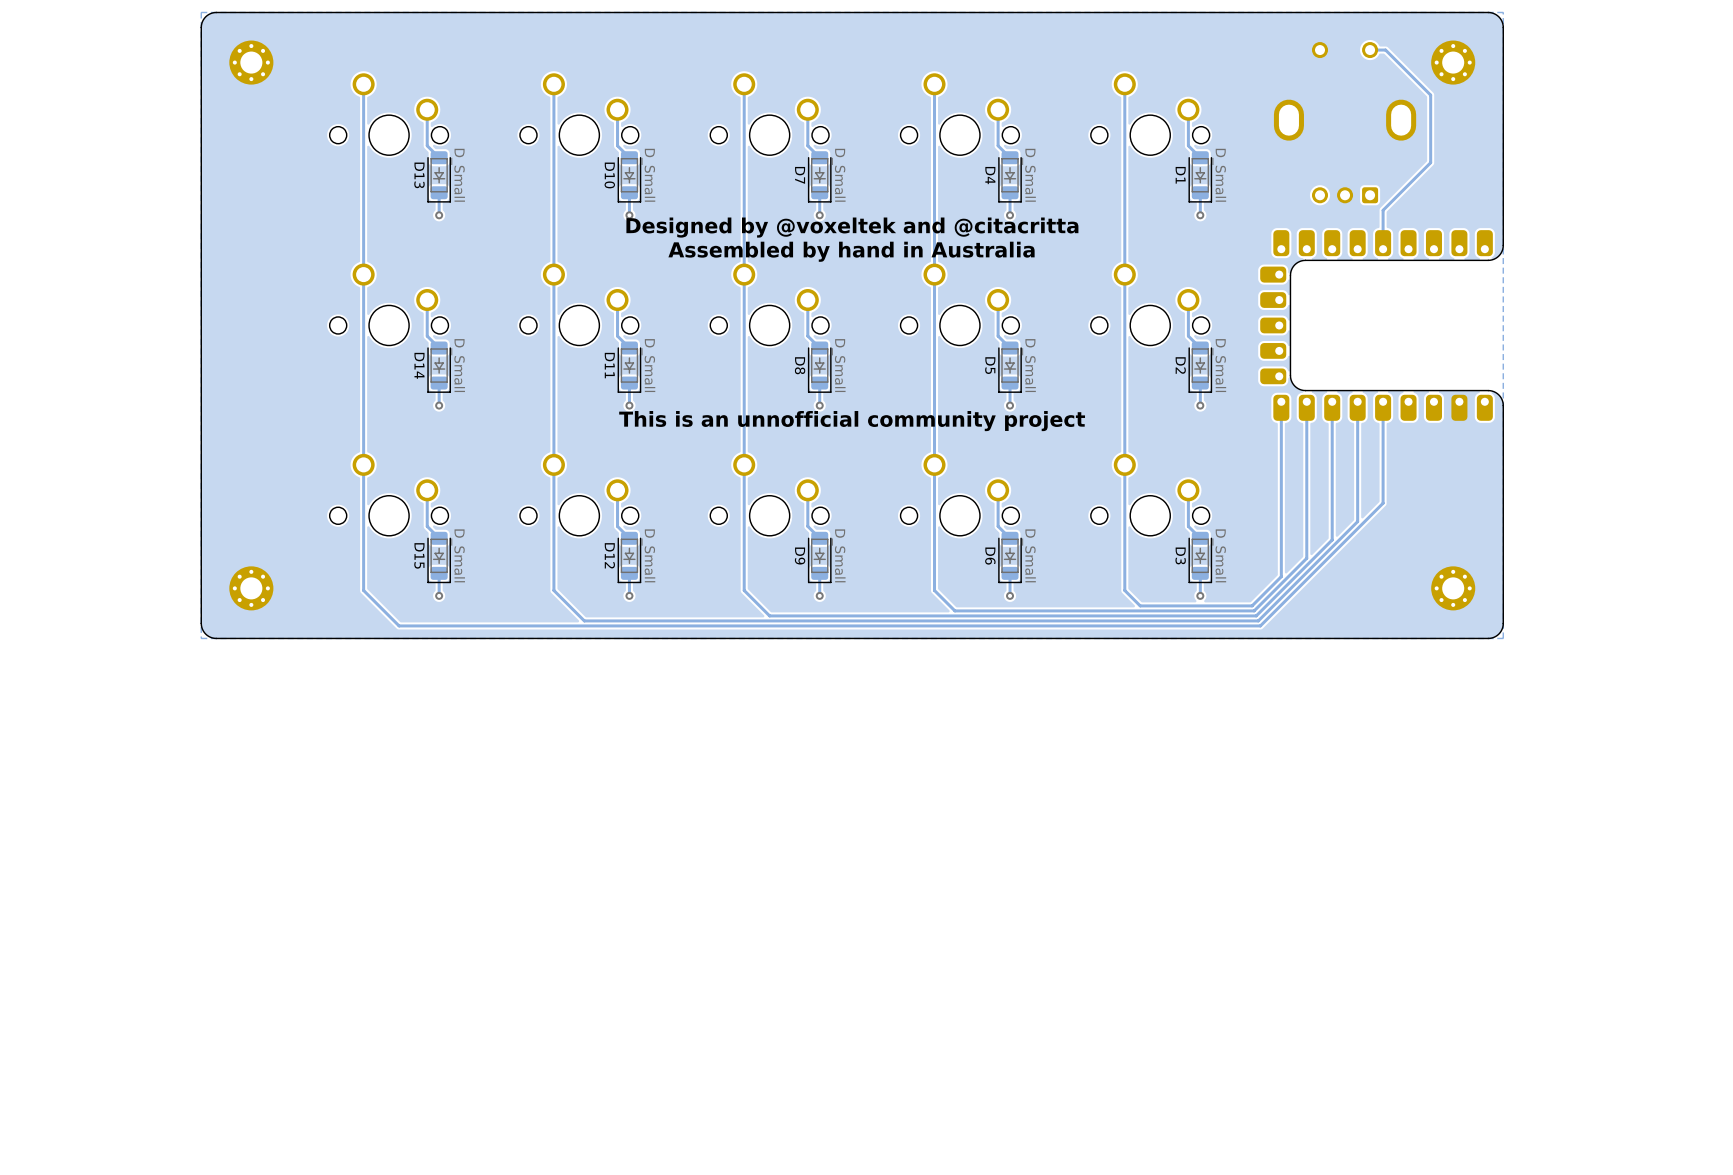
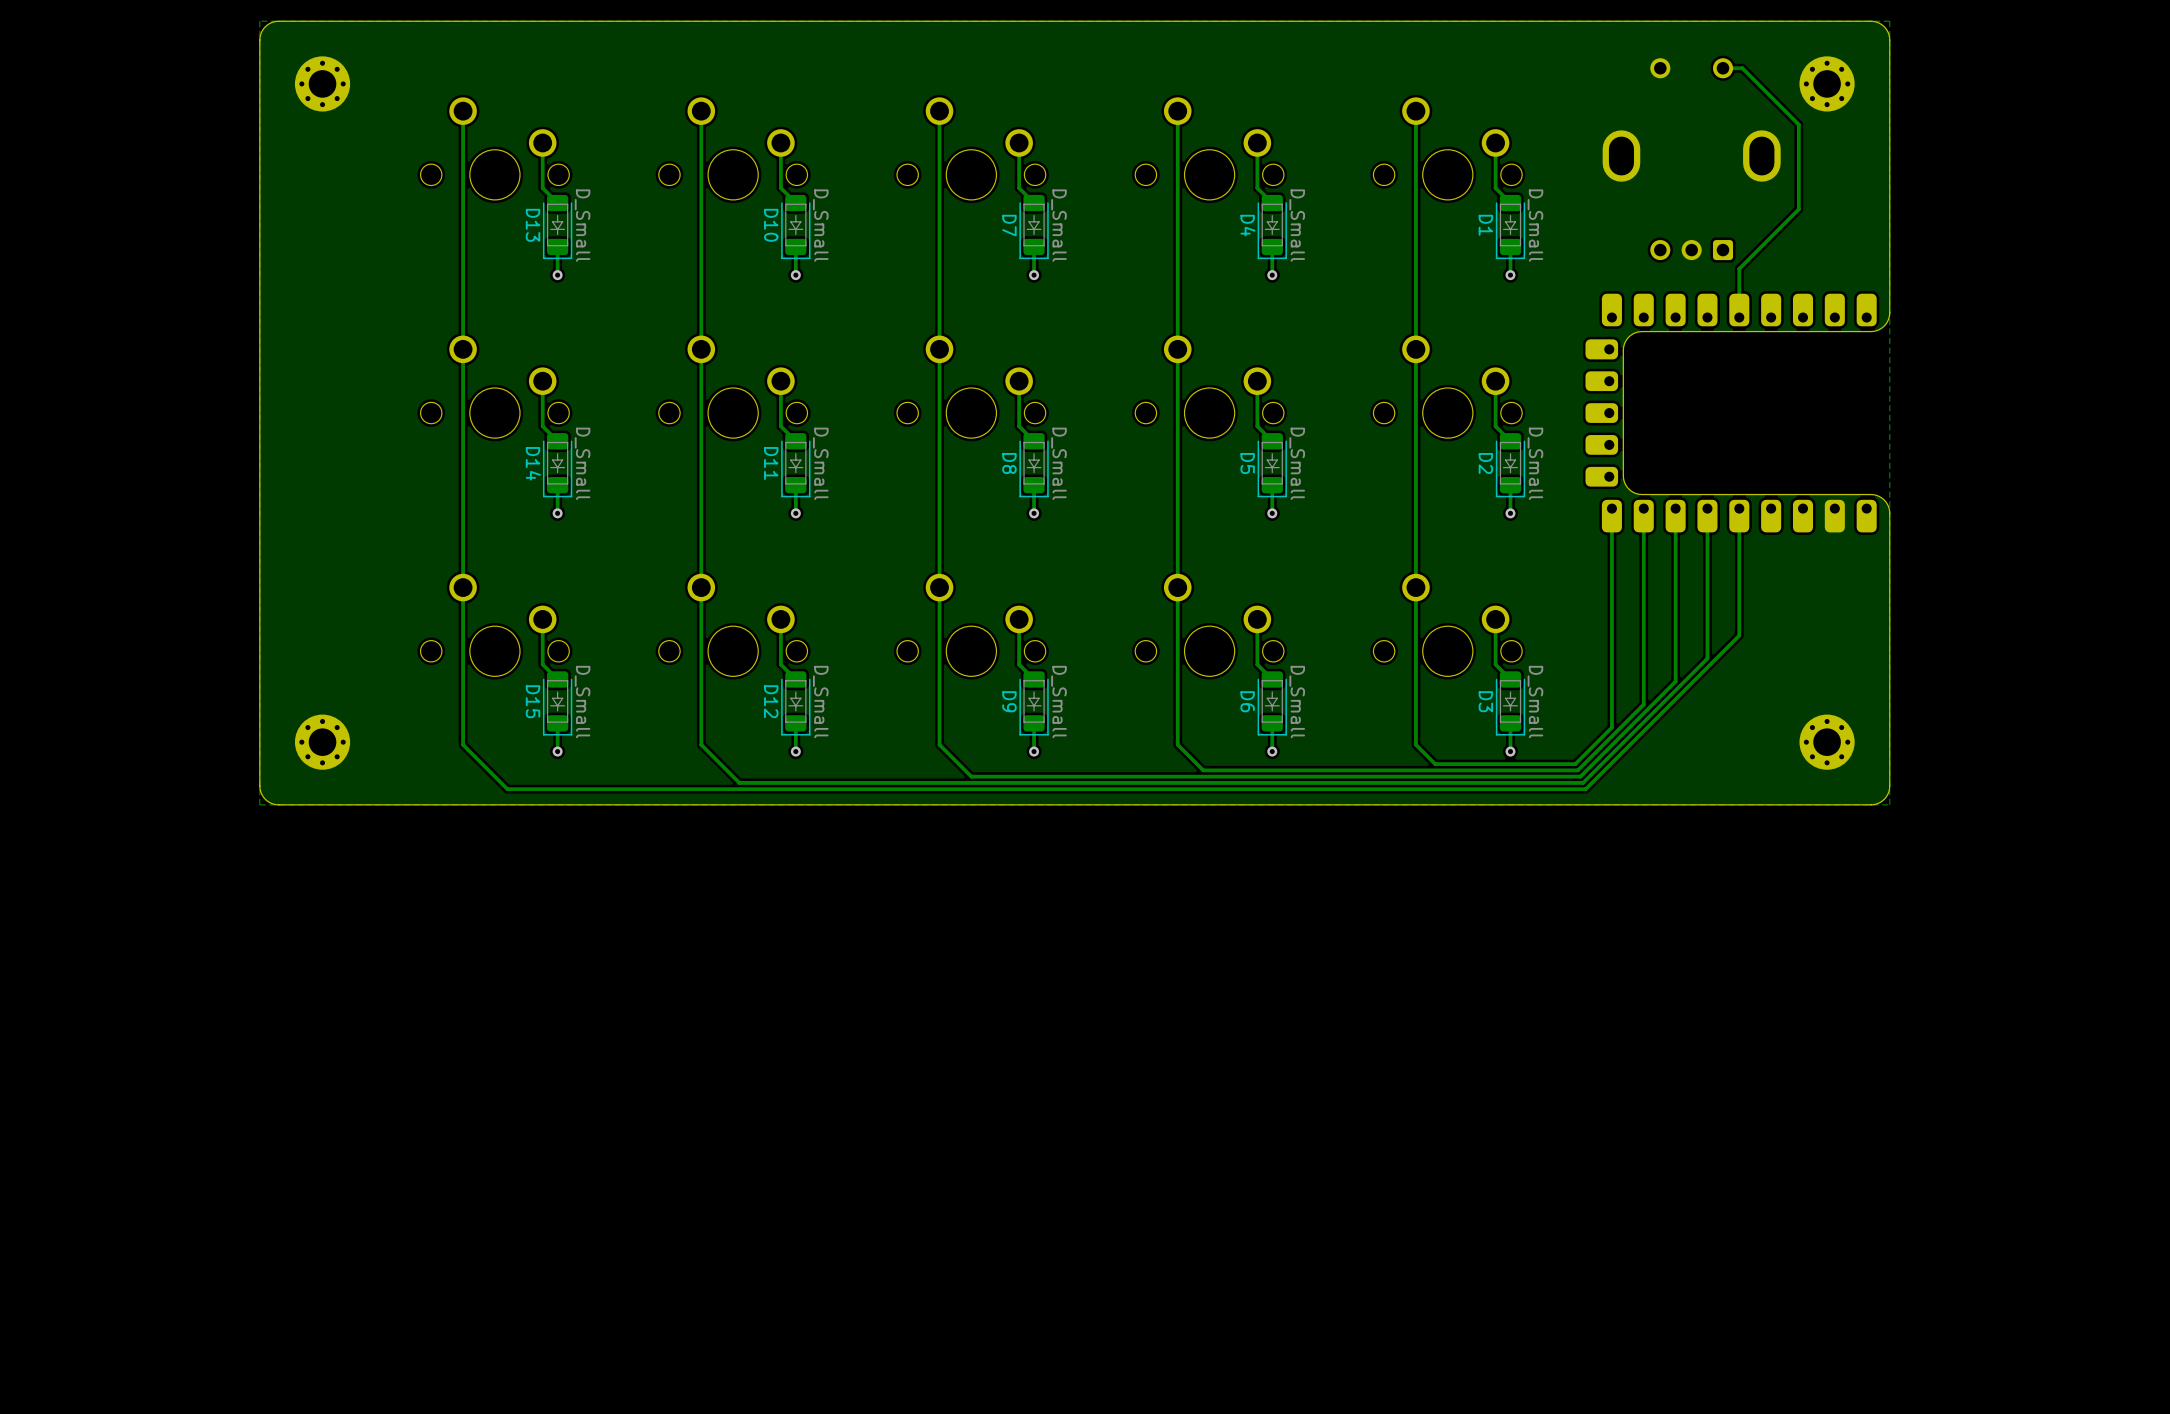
text: Designed by @voxeltek and @citacritta (852, 227) -> none
text: Assembled by hand in Australia (851, 251) -> none
text: This is an unnofficial community project (852, 421) -> none

